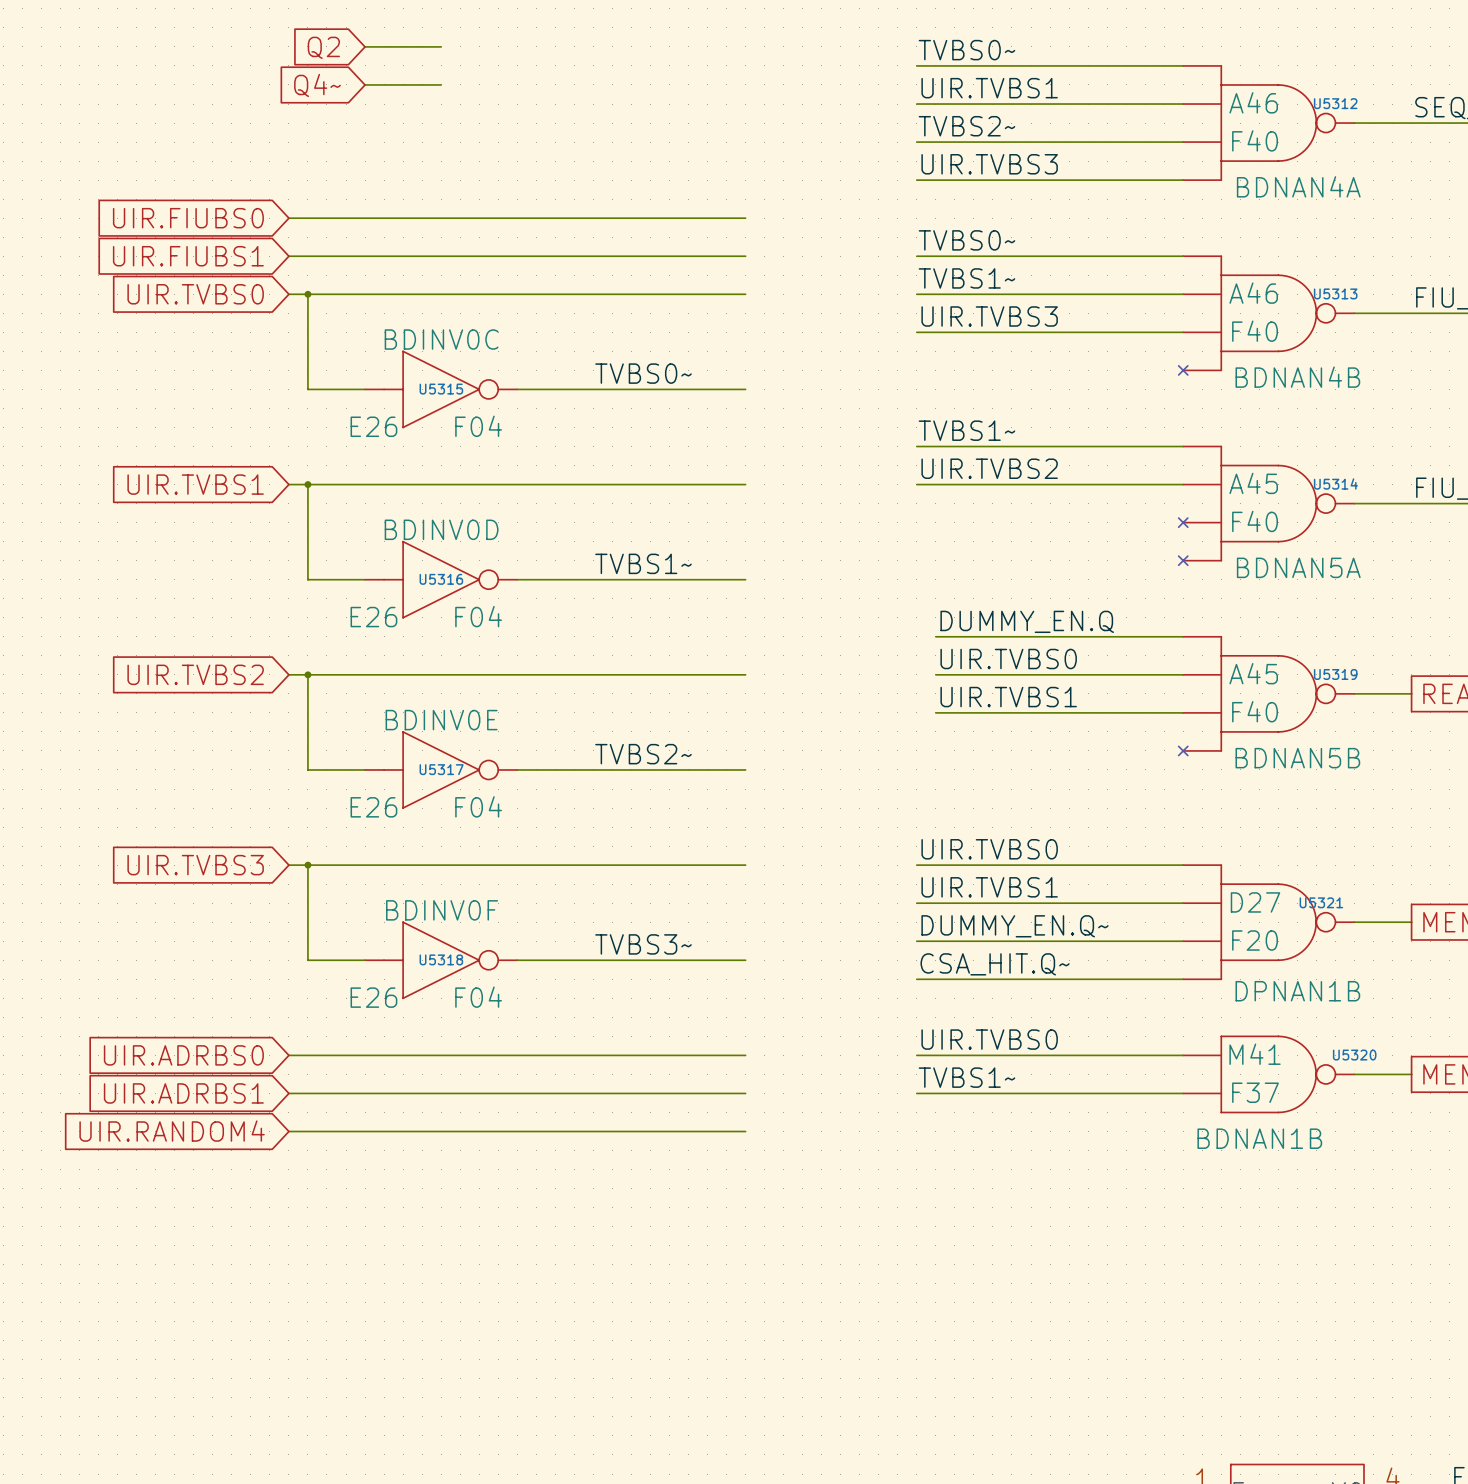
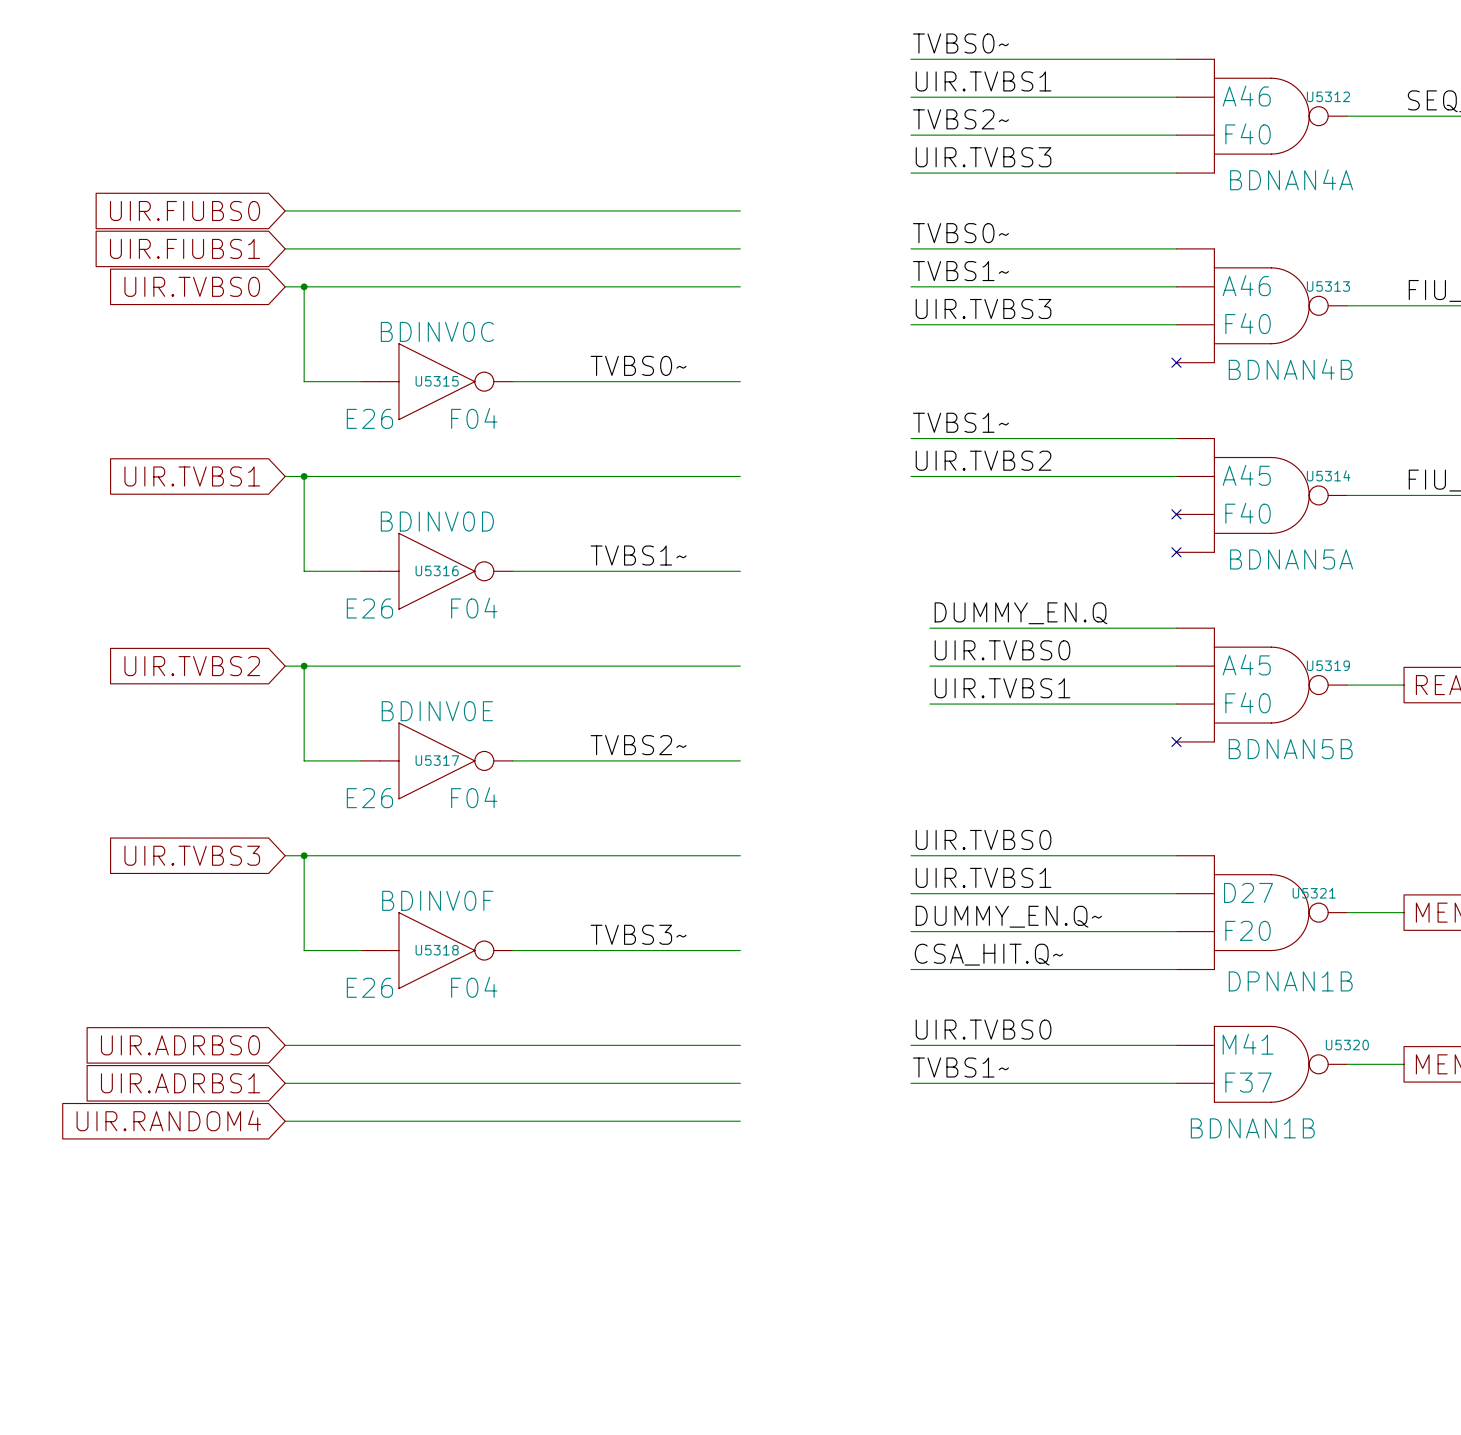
wire: (365, 46) (441, 46) -> none
global label: Q2 (323, 47) -> none
wire: (365, 84) (441, 84) -> none
global label: Q4~ (317, 85) -> none

